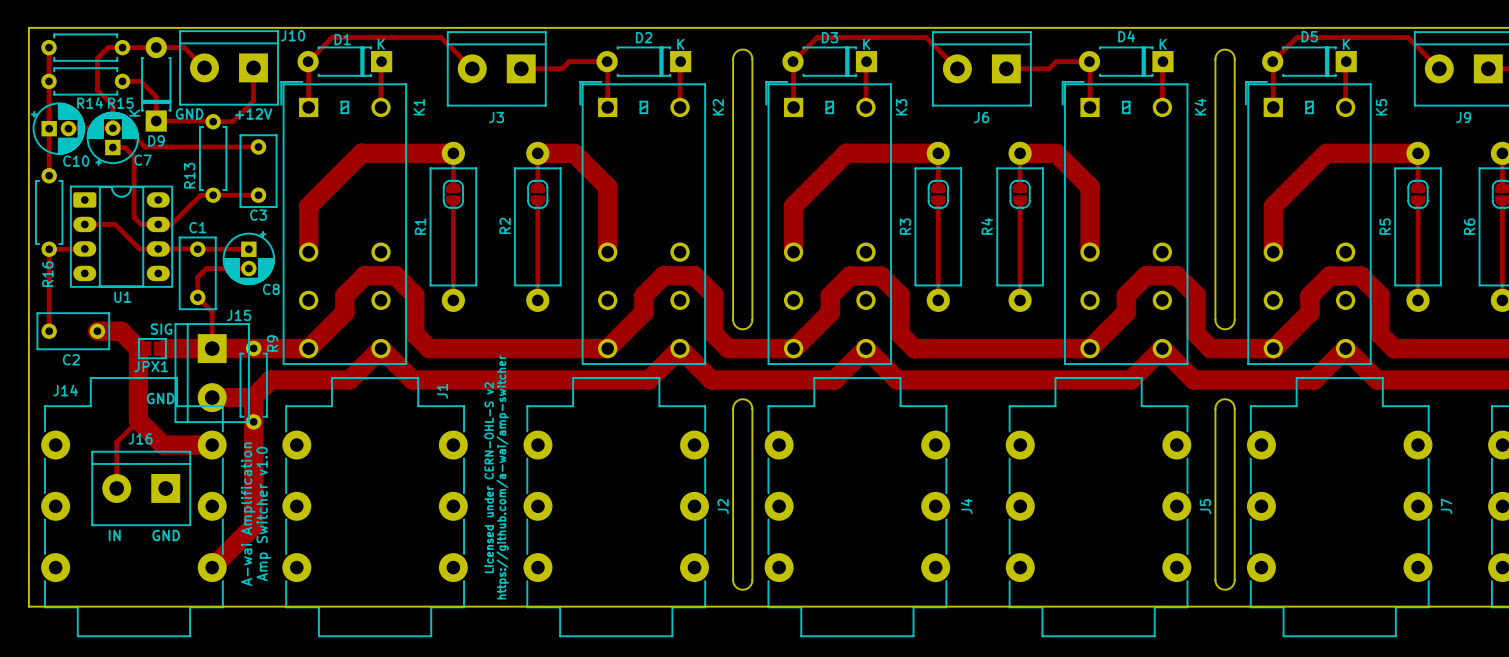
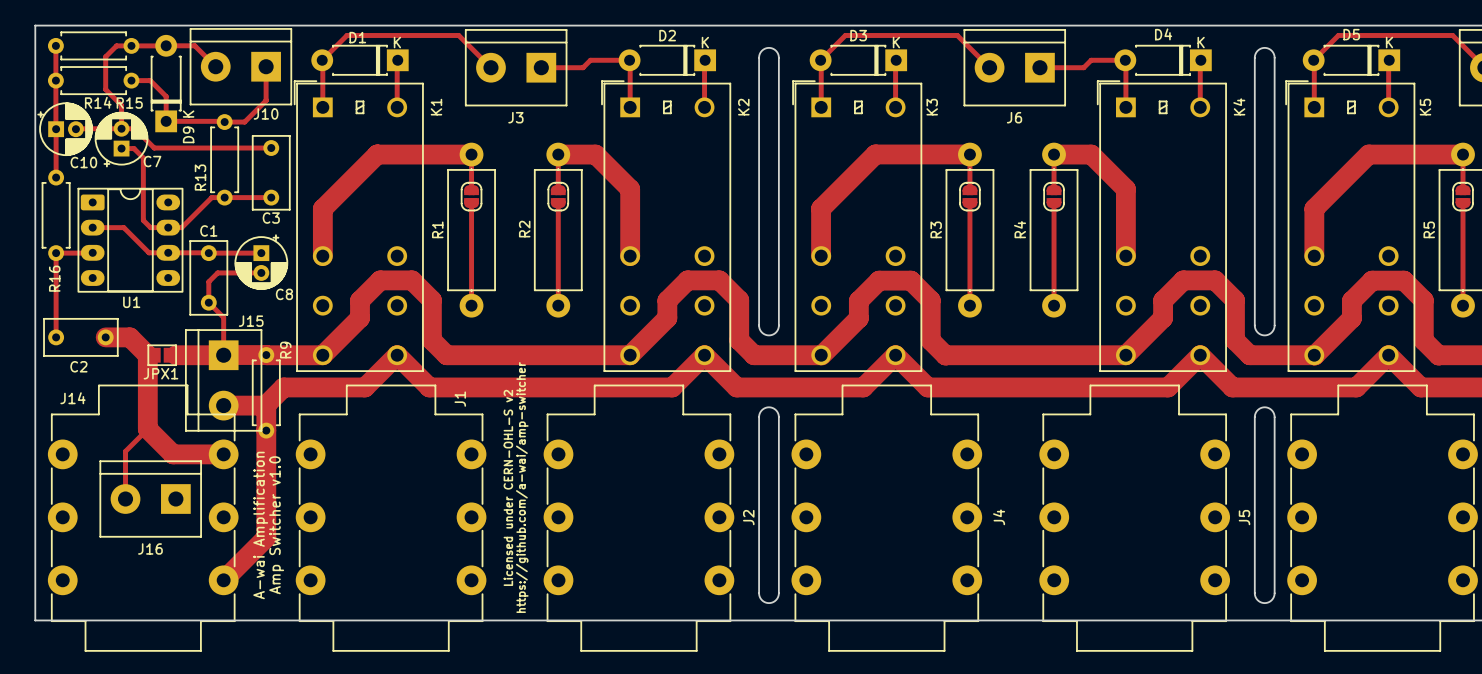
J10 name position: J10 (293, 35) -> J10 (266, 113)
D9 text position: K (134, 113) -> K (188, 114)
text: GND +12V (224, 113) -> none
D9 name rotation: 0° (156, 140) -> 90° counterclockwise (188, 134)
text: SIG (161, 329) -> none
text: GND (160, 398) -> none
J16 name position: J16 (140, 438) -> J16 (150, 549)
text: IN GND (144, 535) -> none

